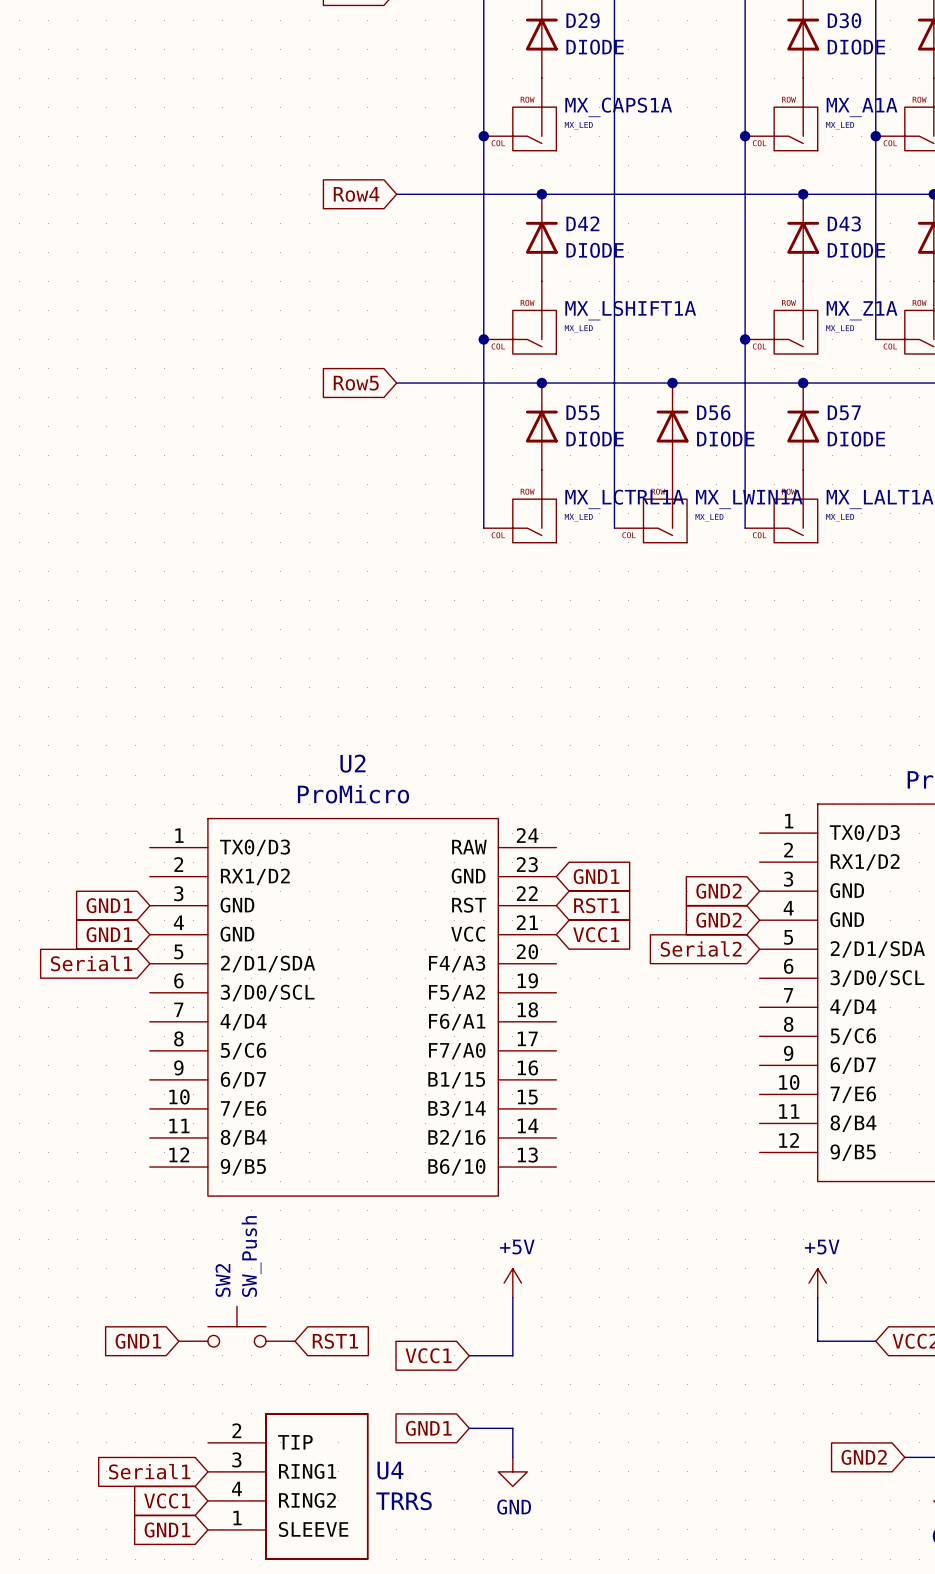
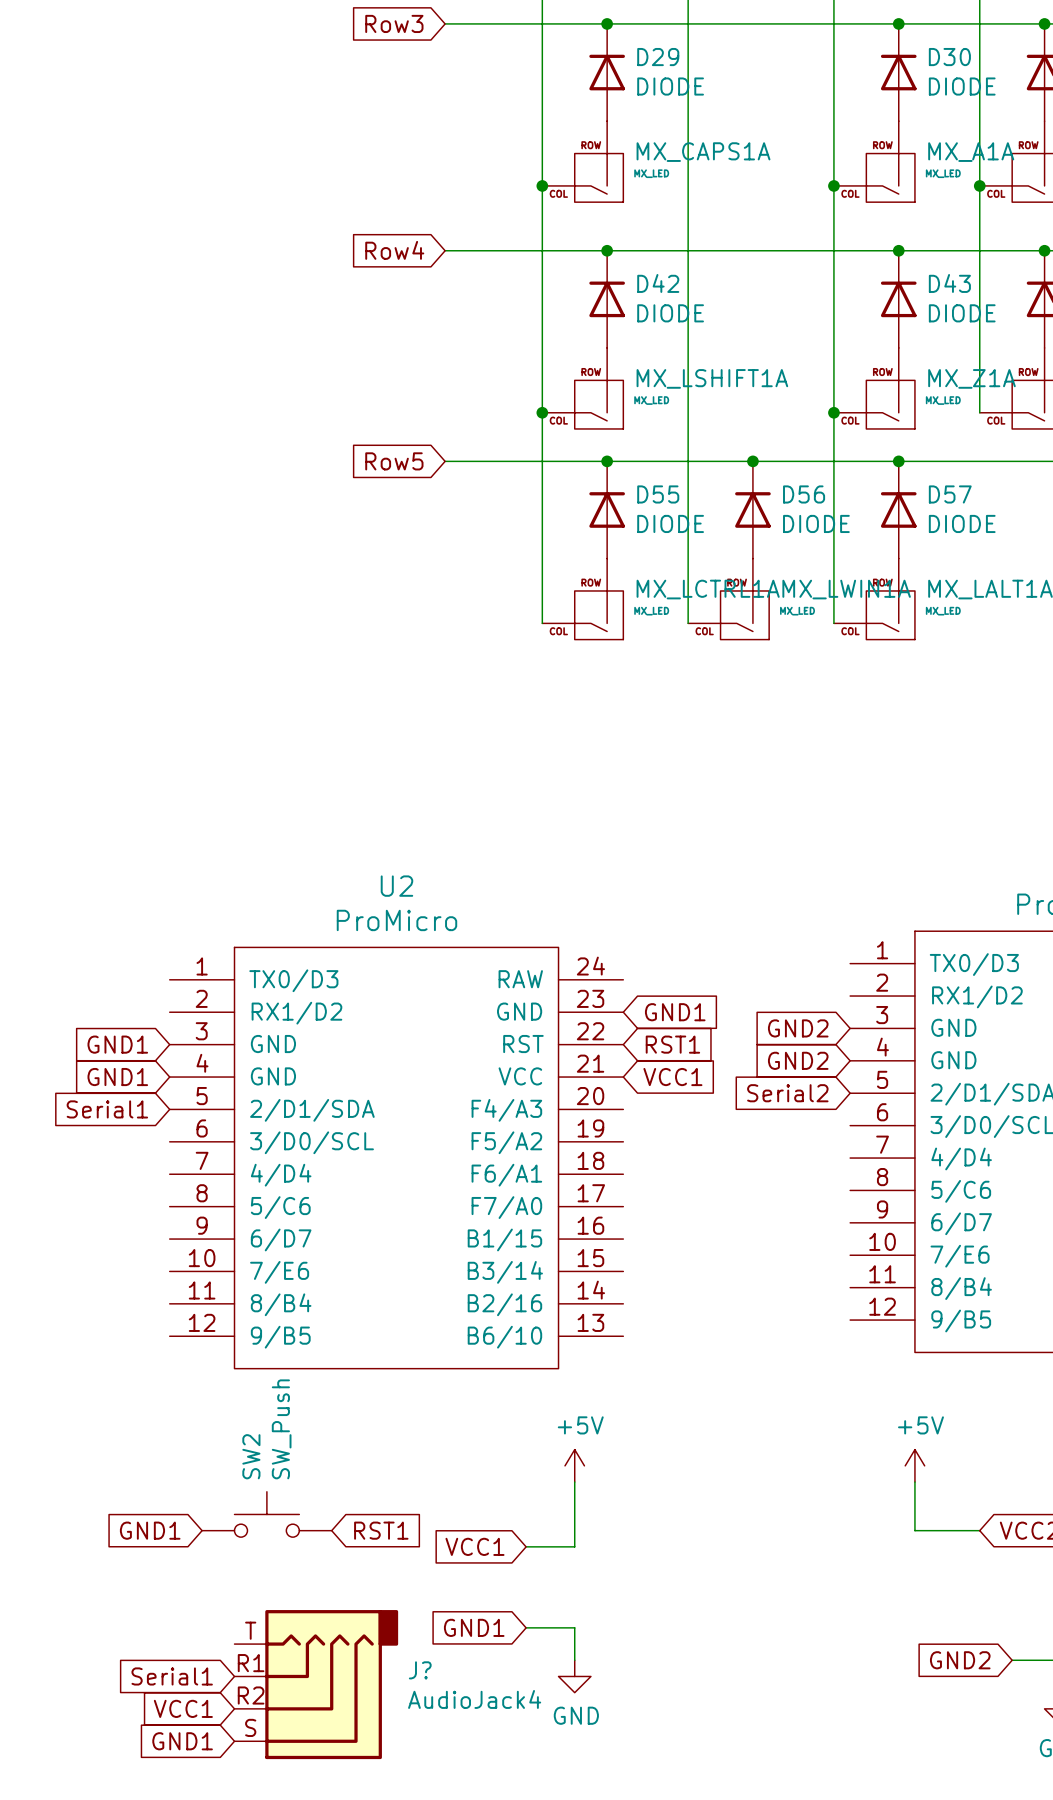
J?: none -> AudioJack4 (316, 1684)
U4: TRRS (287, 1486) -> none

